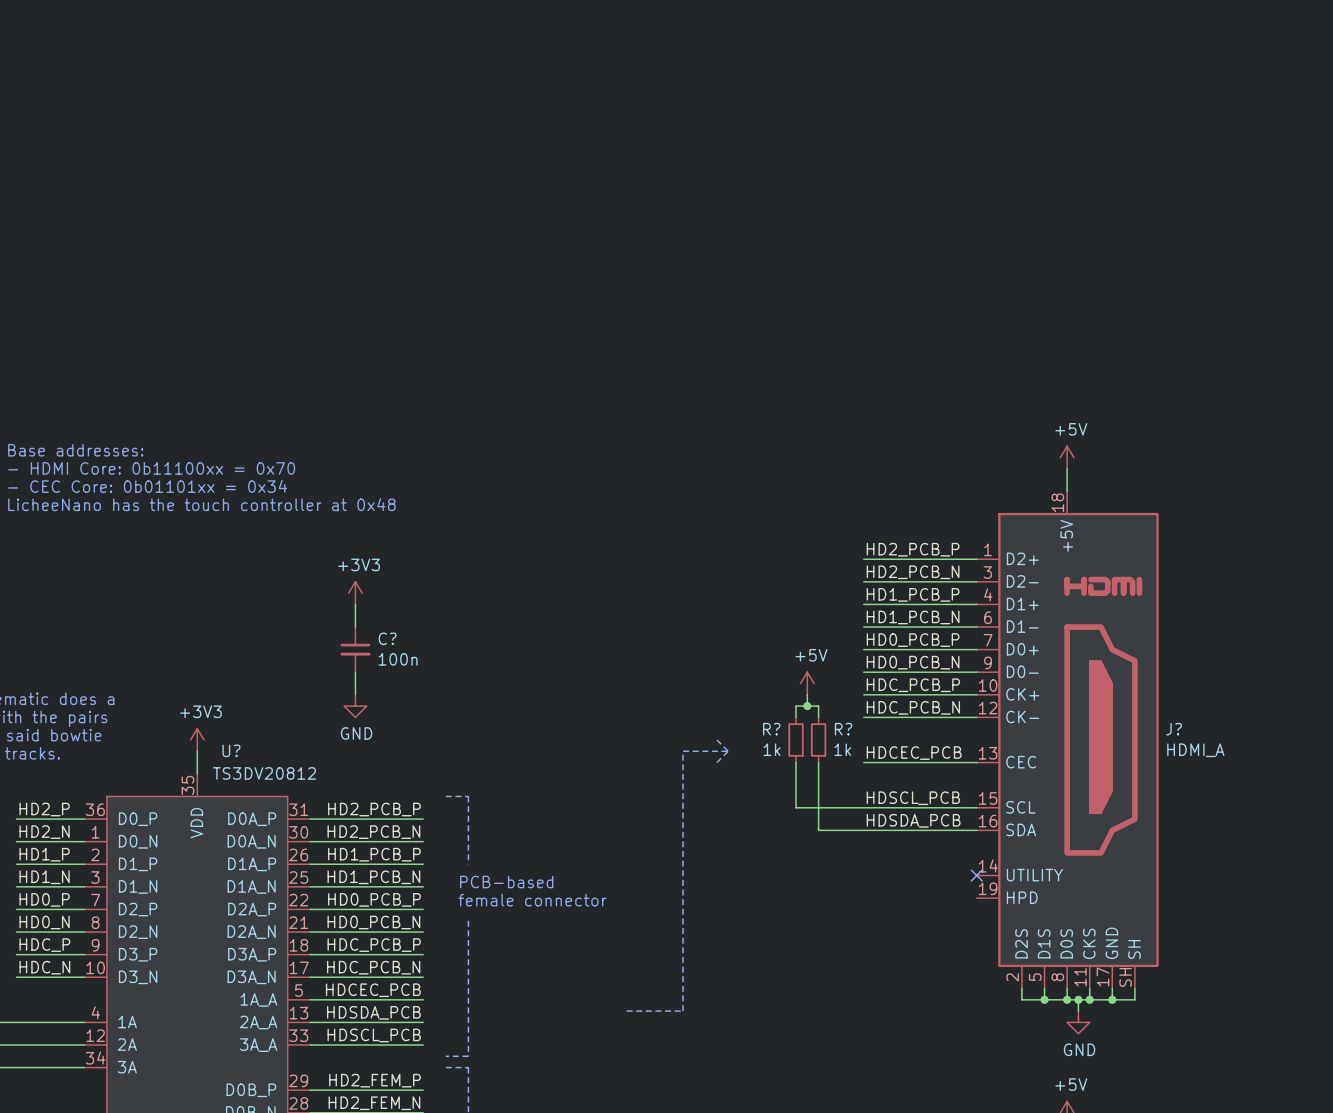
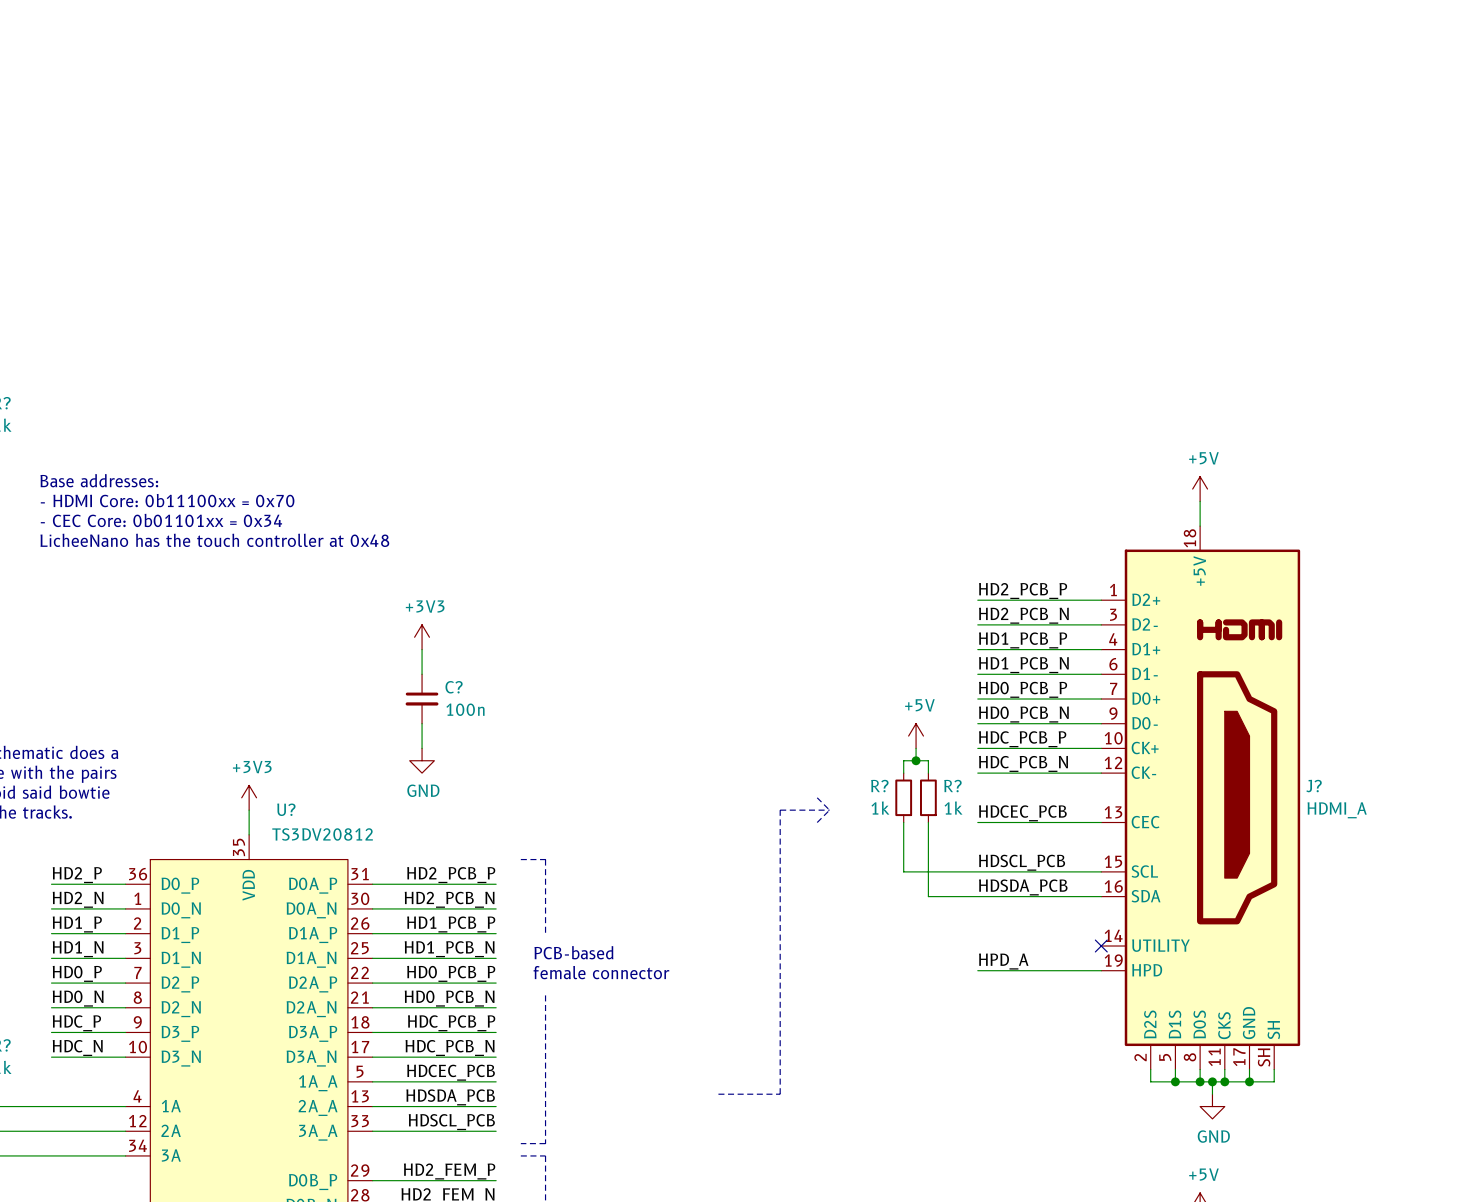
label: none -> HPD_A (1003, 961)
wire: none -> (977, 970) (1101, 970)

